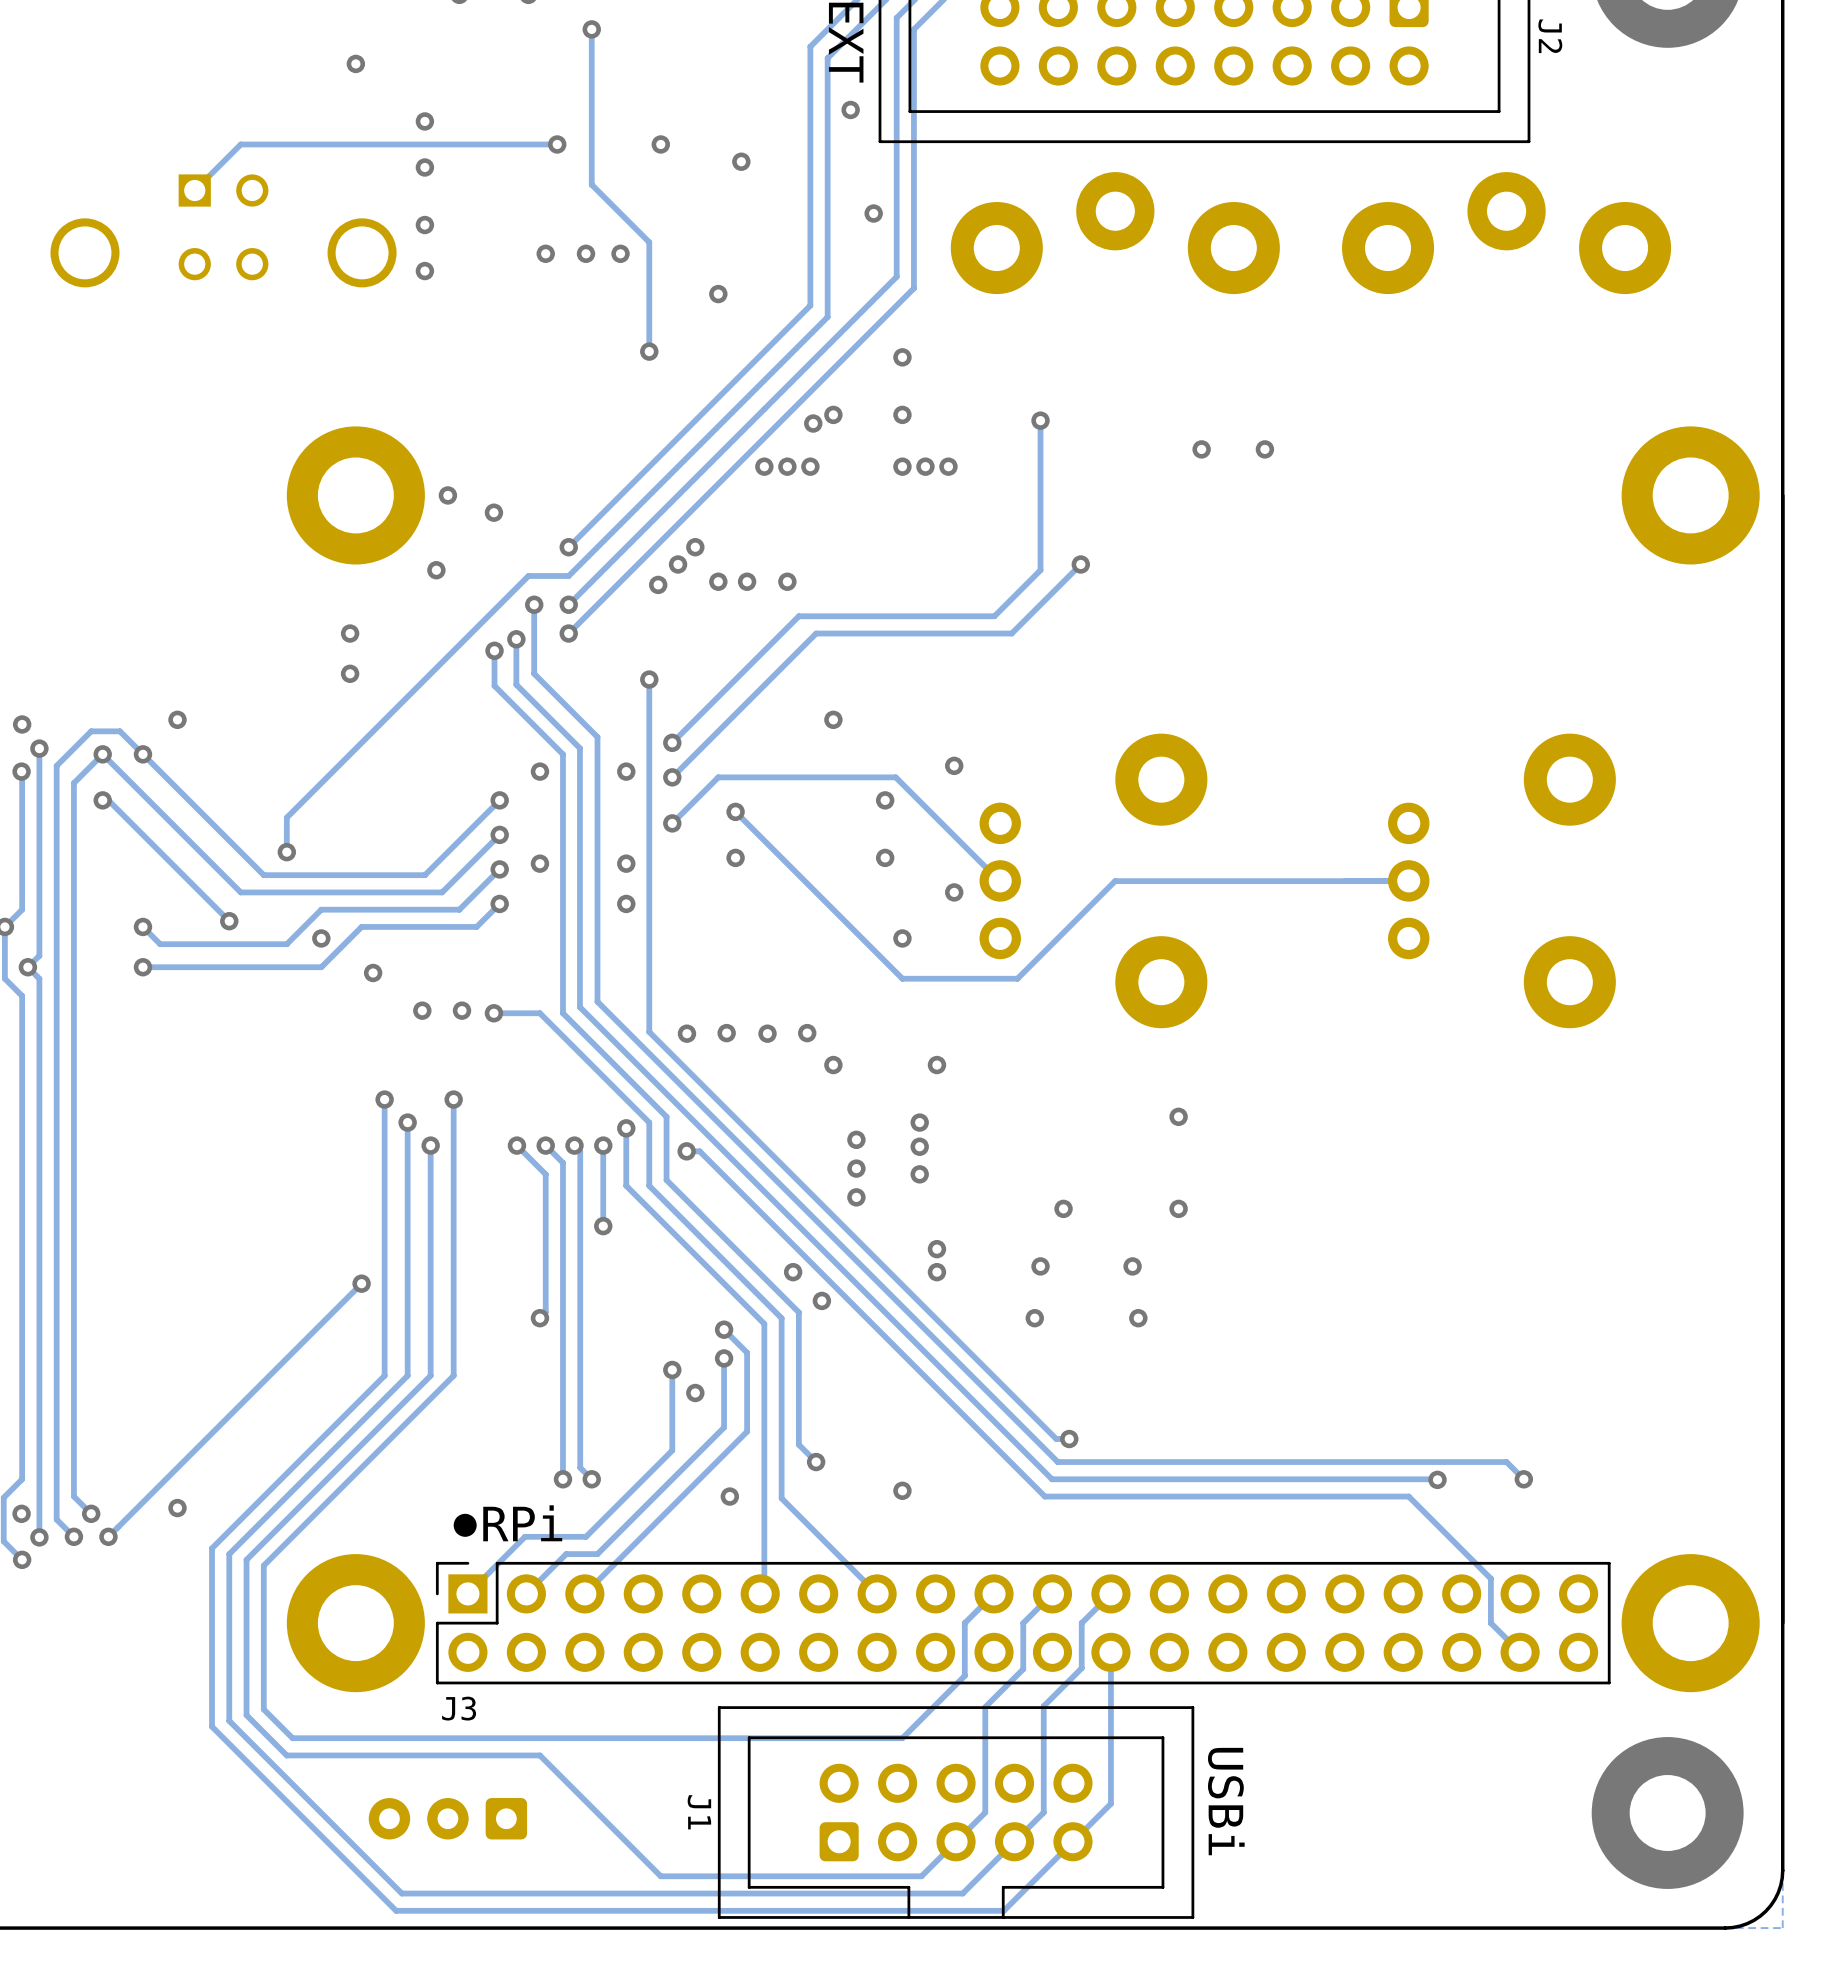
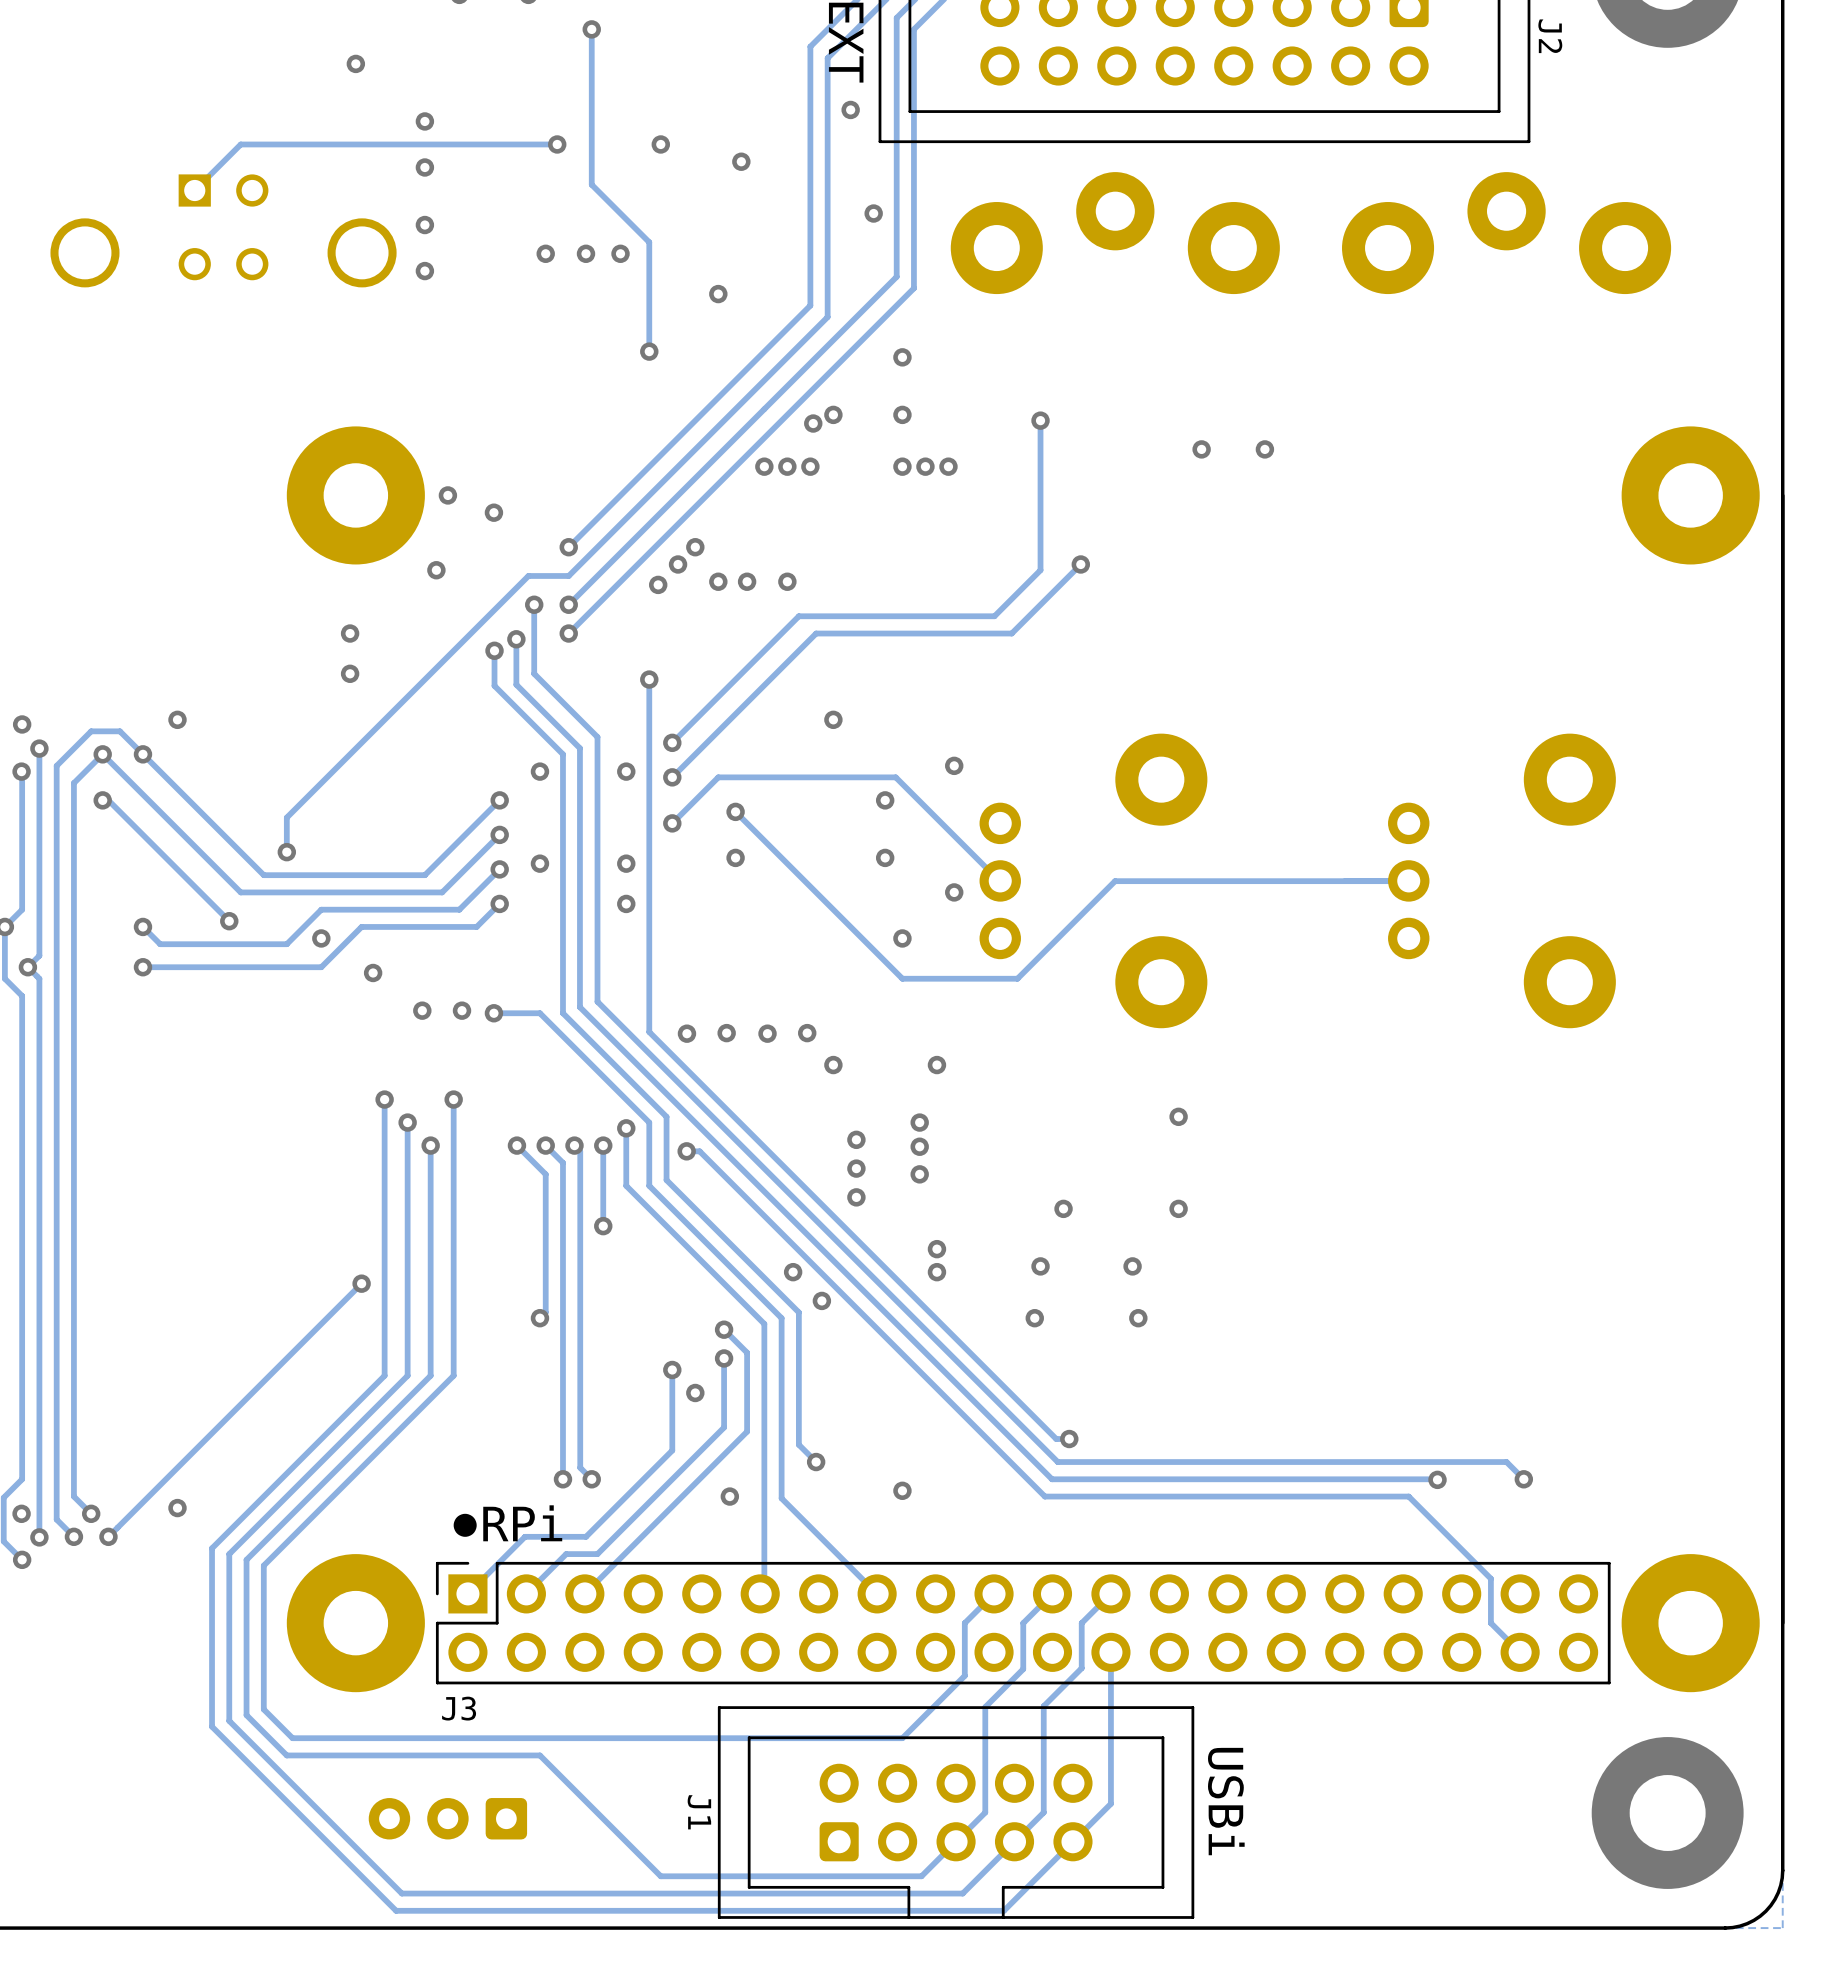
J3 footprint: [286, 426, 1785, 1693] -> [286, 426, 1785, 1693]

